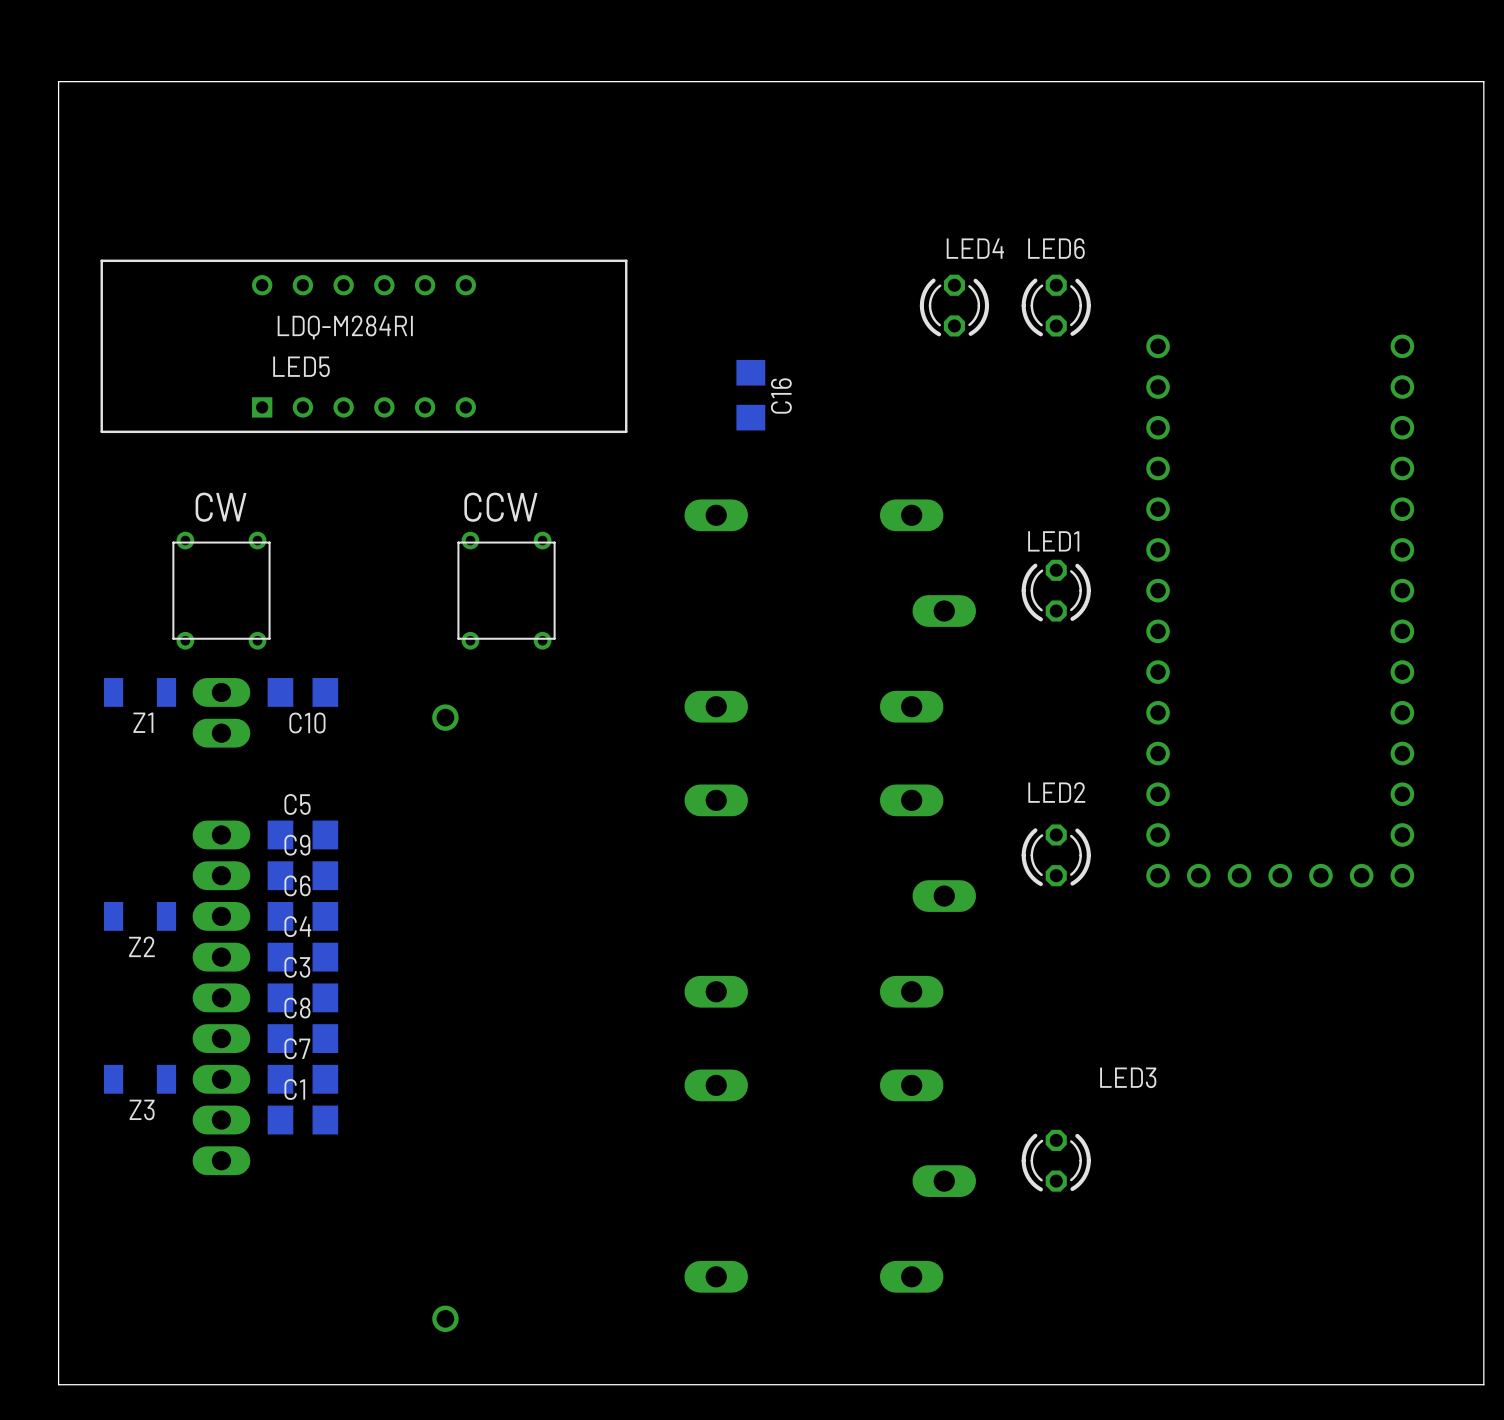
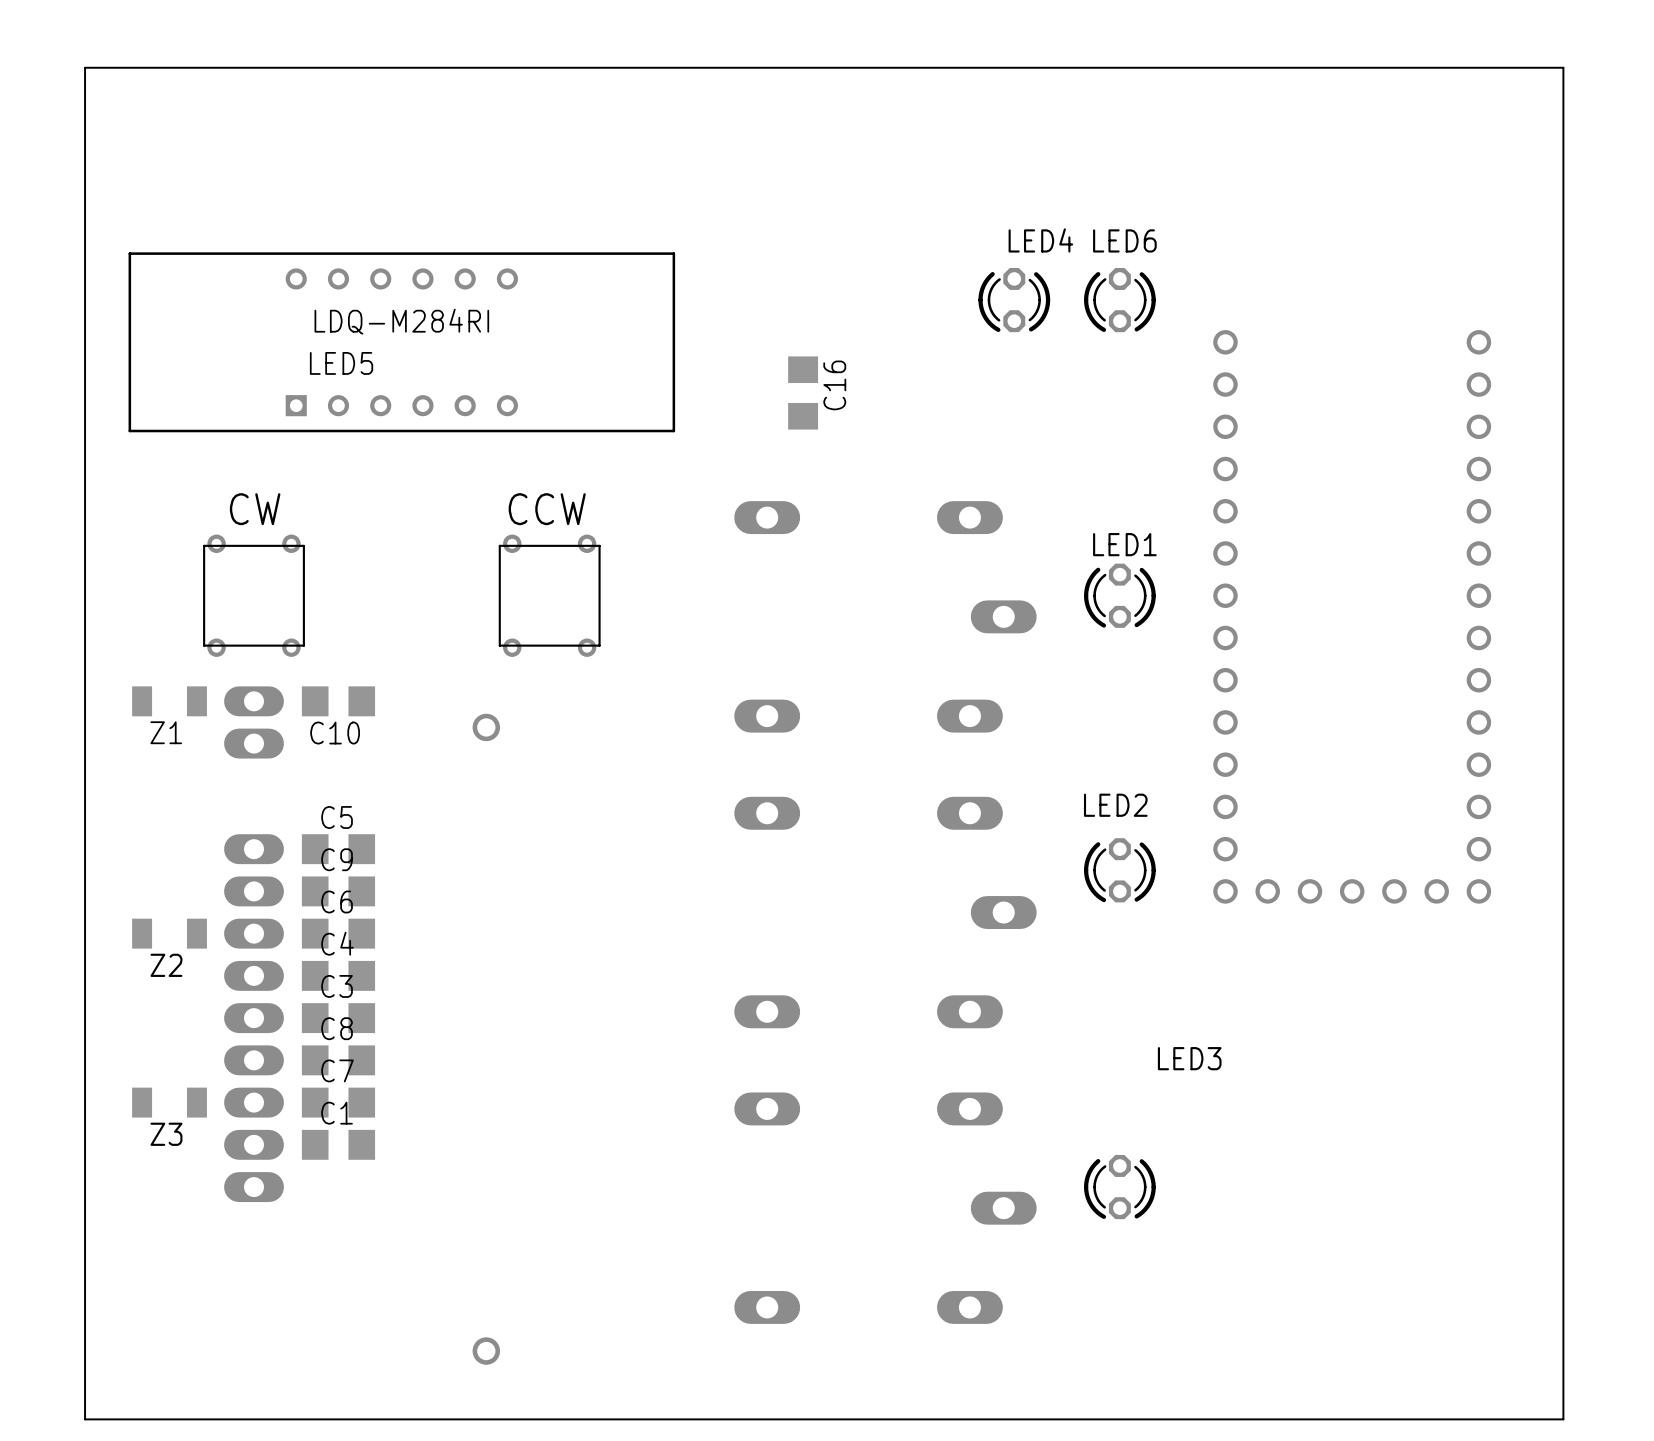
LED3 name position: LED3 (1128, 1077) -> LED3 (1189, 1058)

